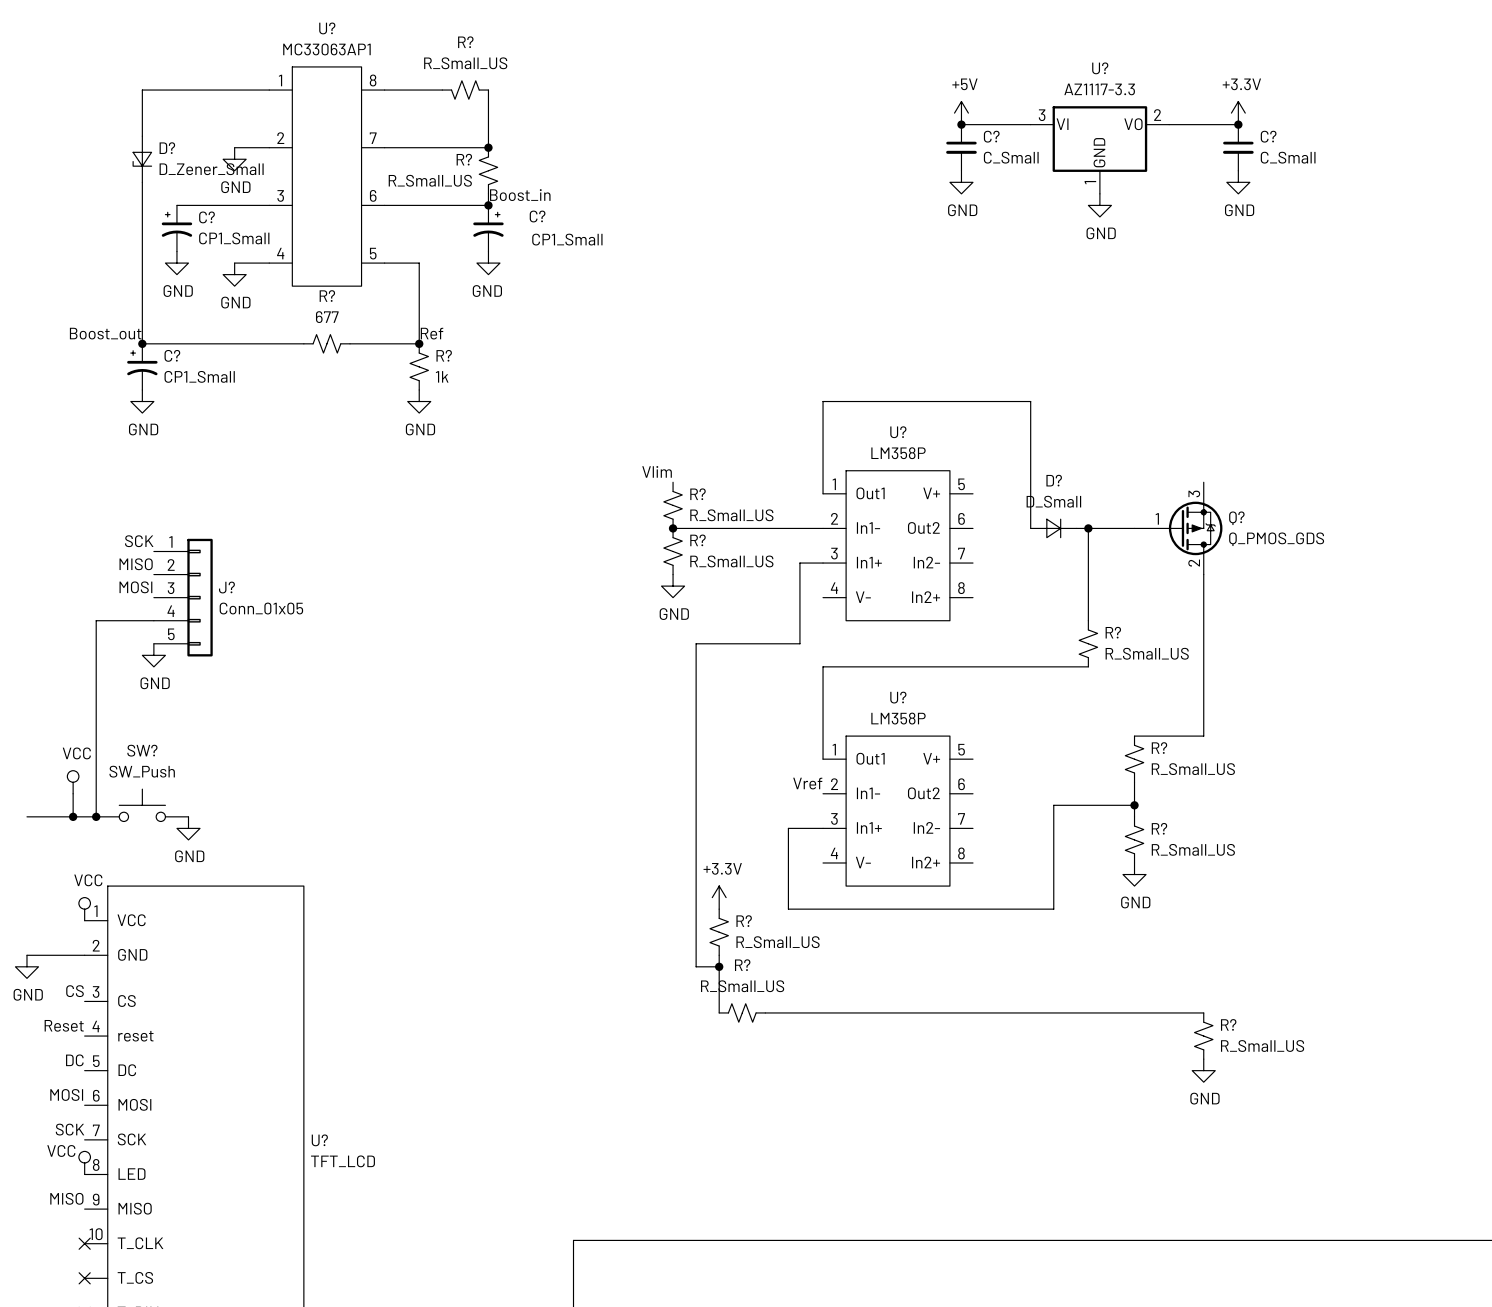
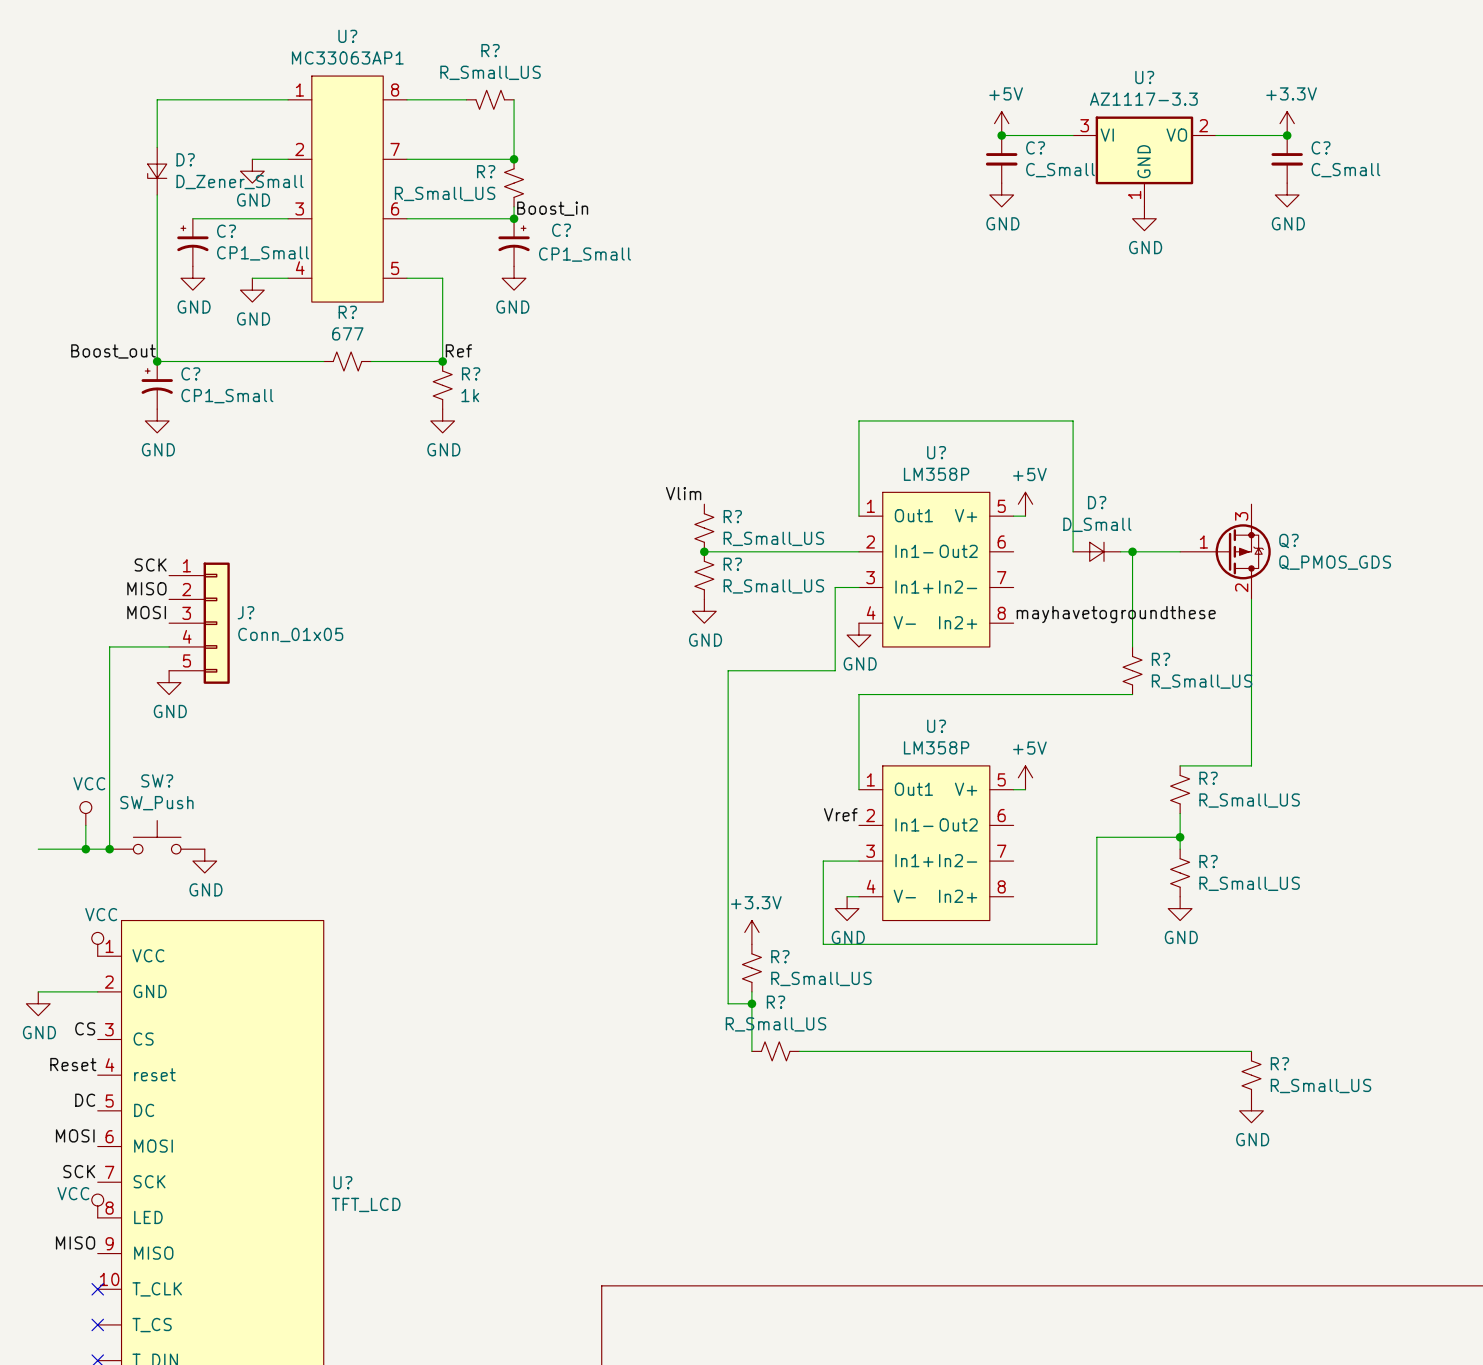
power symbol: none -> +5V (1025, 504)
wire: none -> (1013, 516) (1025, 516)
label: none -> mayhavetogroundthese (1116, 614)
power symbol: none -> GND (858, 635)
power symbol: none -> +5V (1025, 777)
wire: none -> (1013, 789) (1025, 789)
wire: none -> (847, 896) (858, 896)
power symbol: none -> GND (847, 908)

